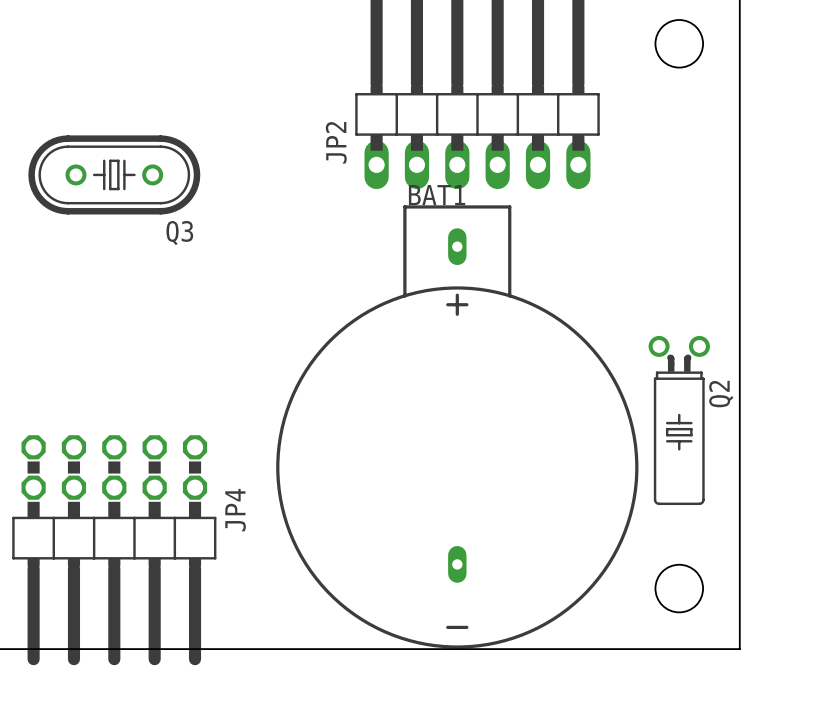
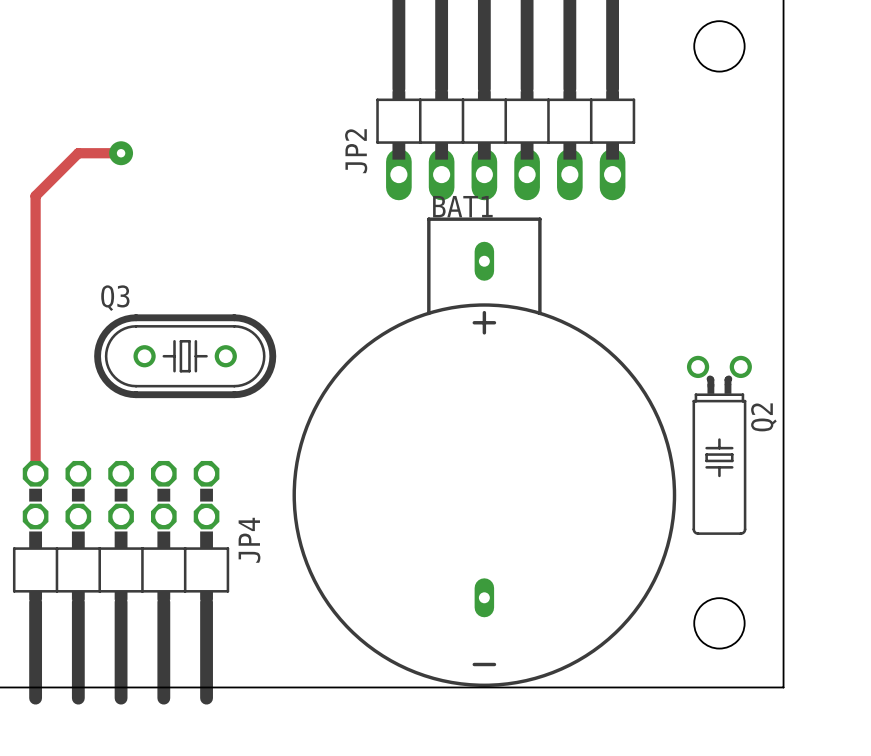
track: none -> (121, 153) (78, 153) (35, 195) (35, 473)
via: none -> (121, 153)
Q3 position: (114, 174) -> (185, 356)
Q3 name position: Q3 (179, 233) -> Q3 (115, 298)

